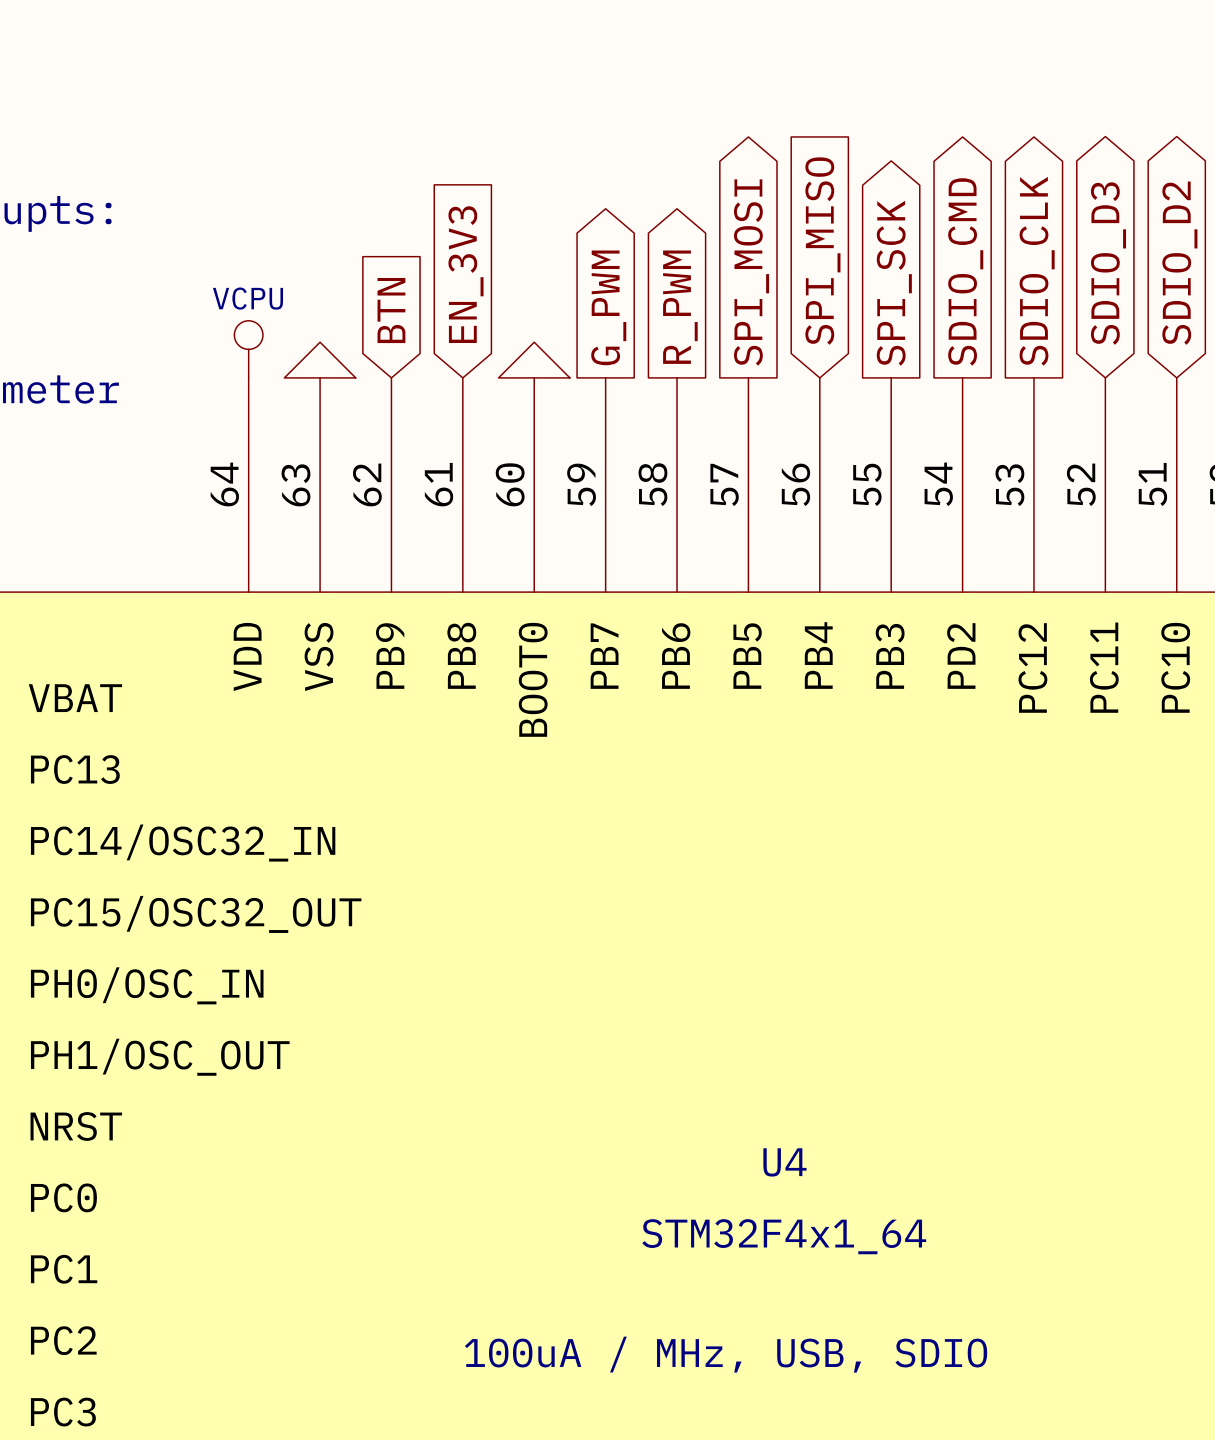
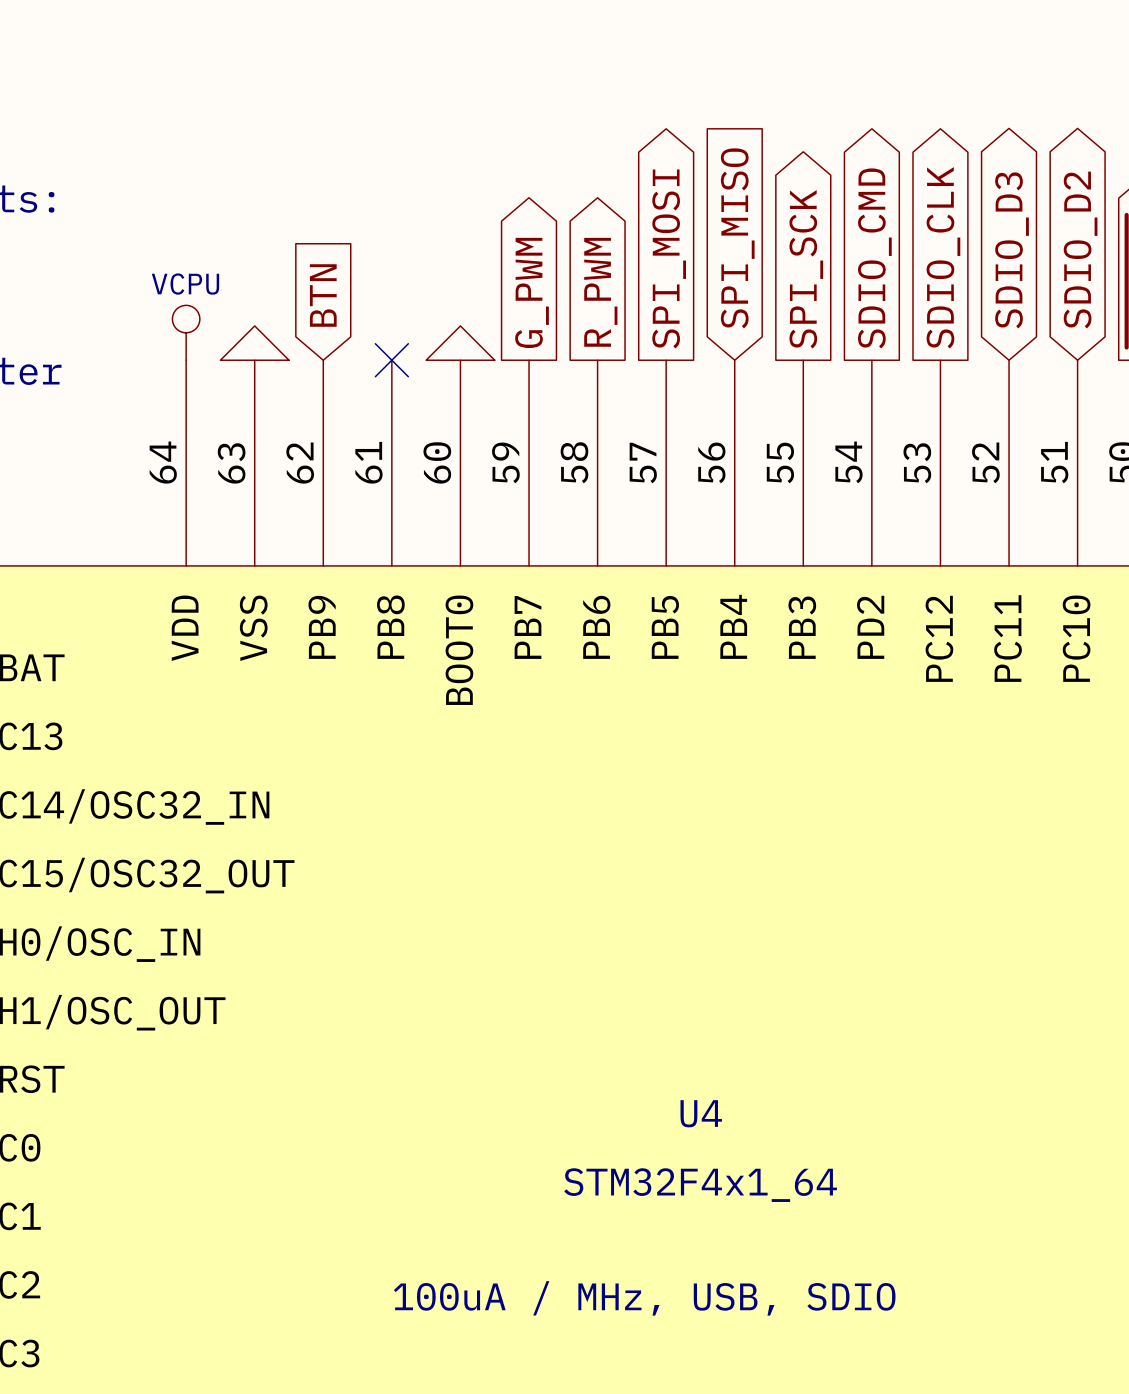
global label: EN_3V3 (465, 274) -> none
no-connect mark: none -> (391, 360)

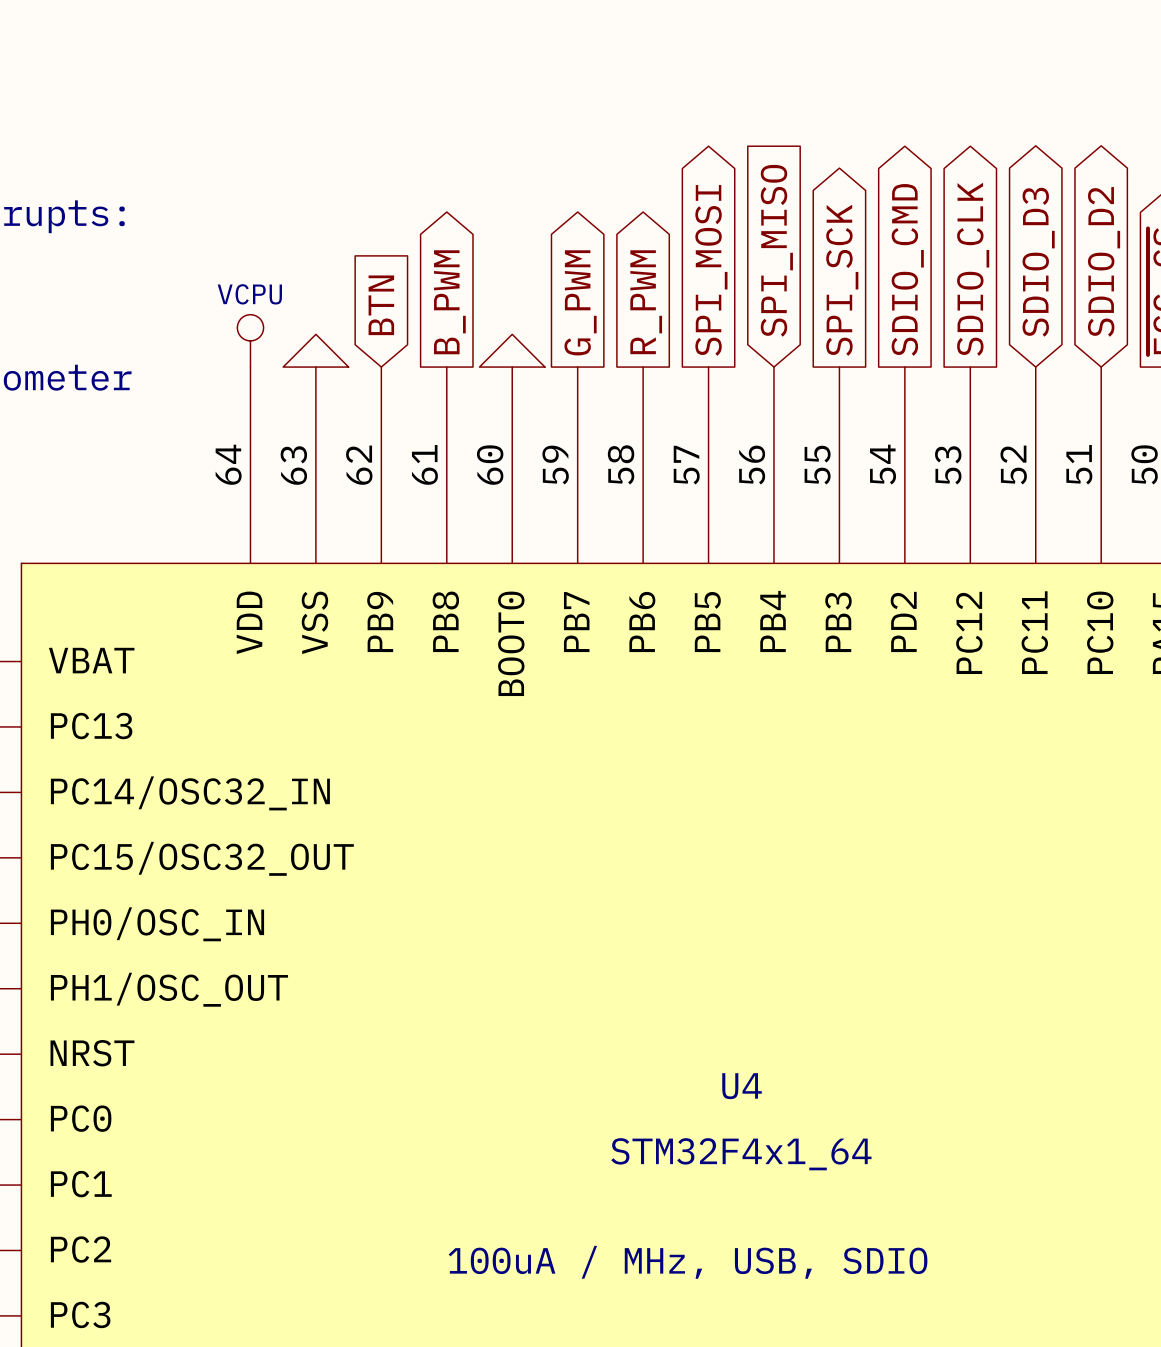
global label: none -> B_PWM (449, 302)
no-connect mark: (391, 360) -> none

